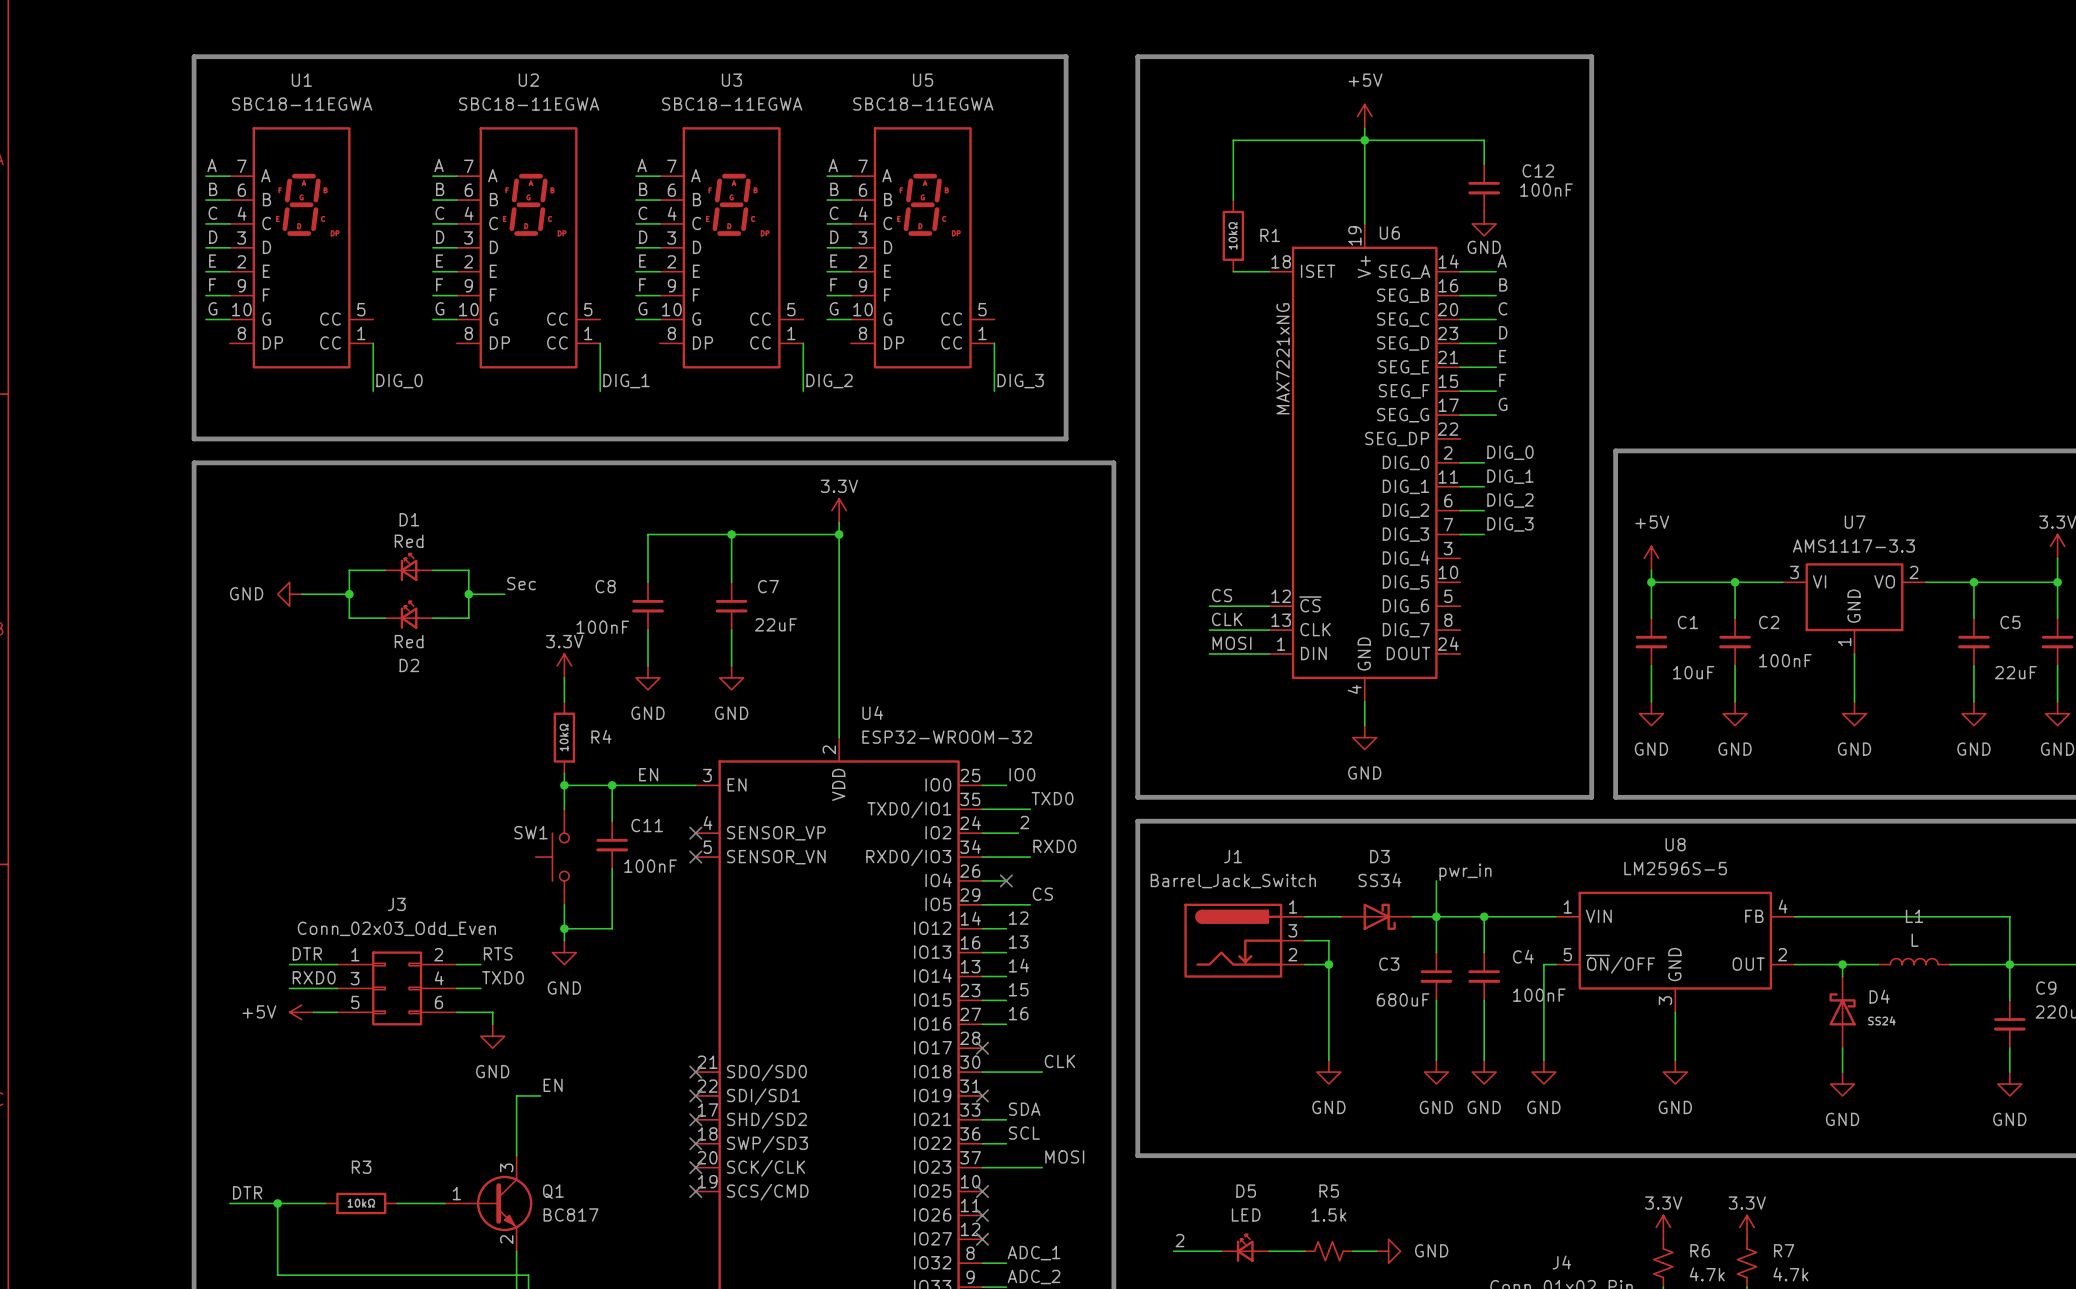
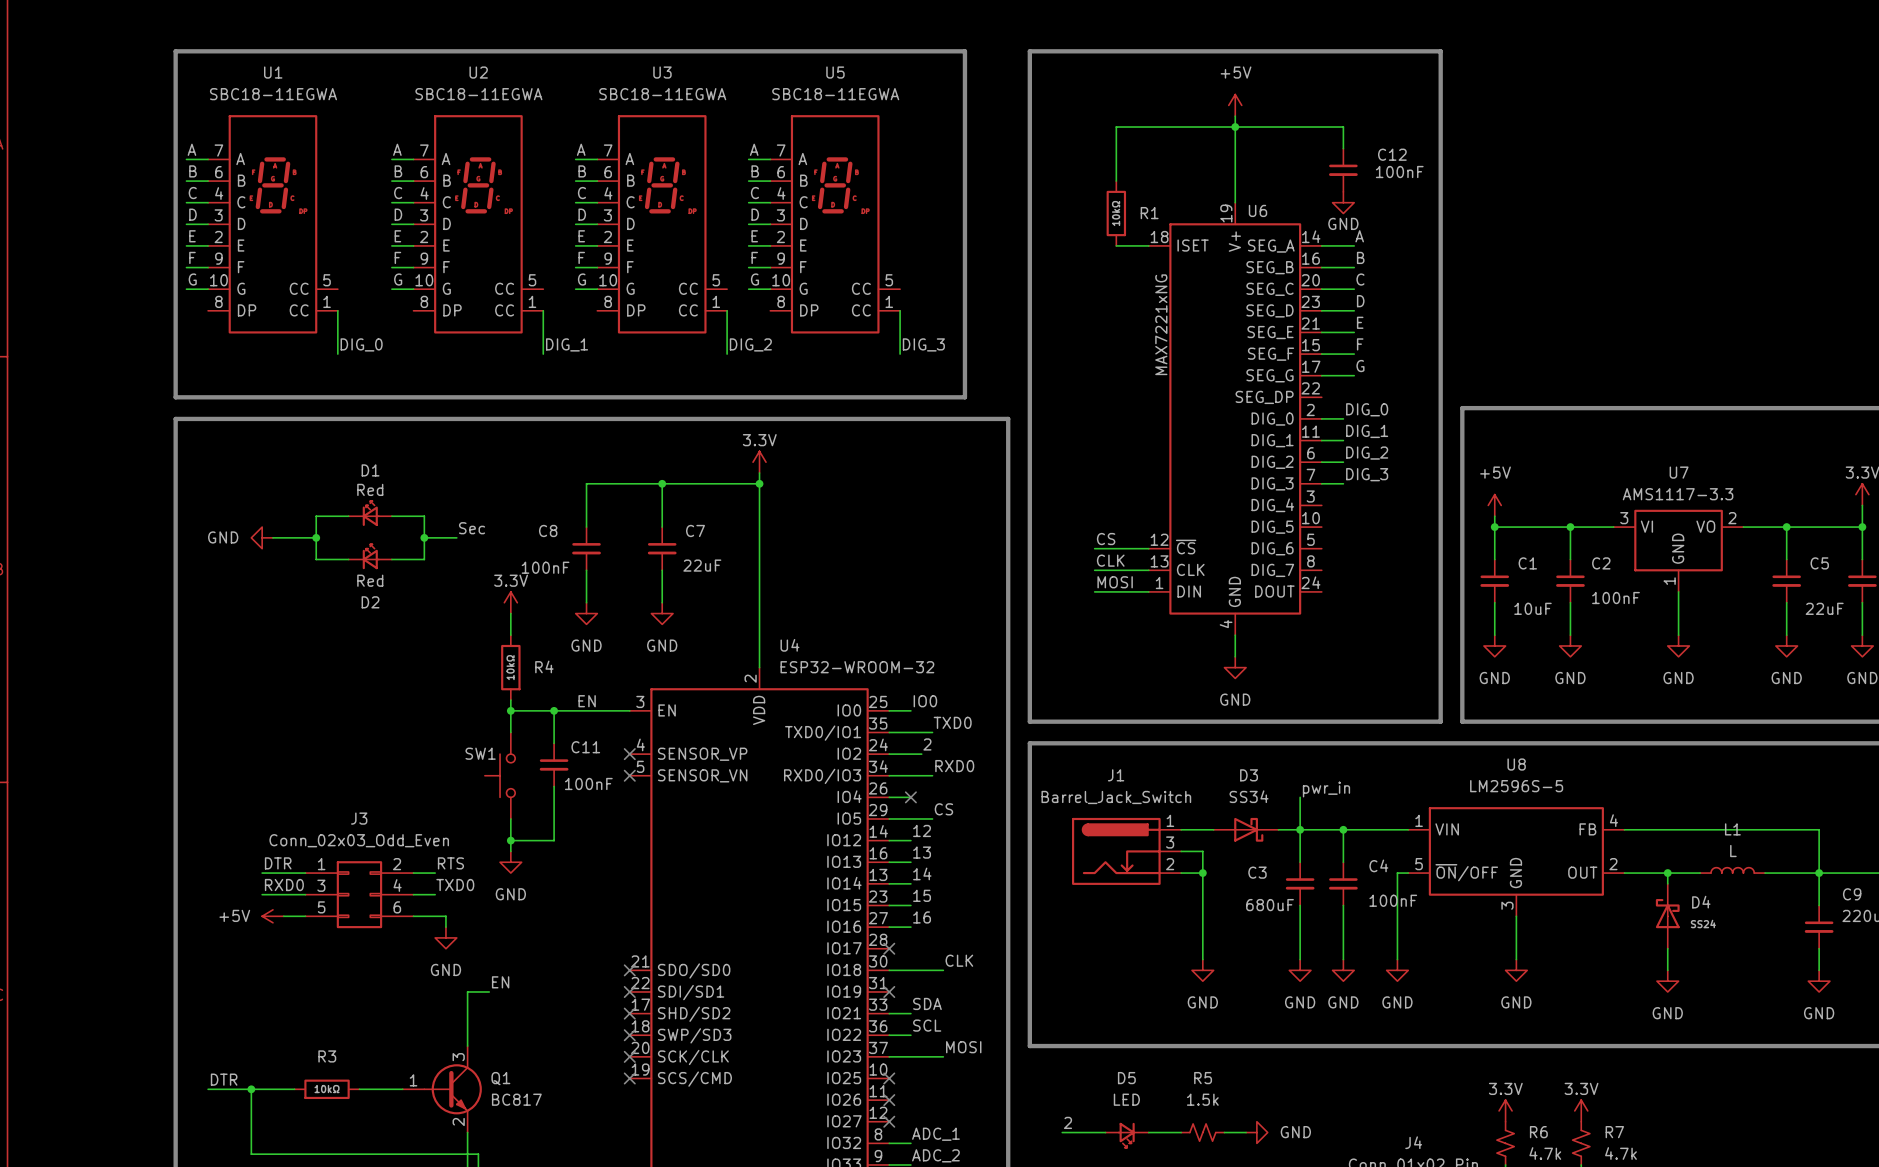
D5 rotation: 0° (1245, 1248) -> 180° (1126, 1135)

